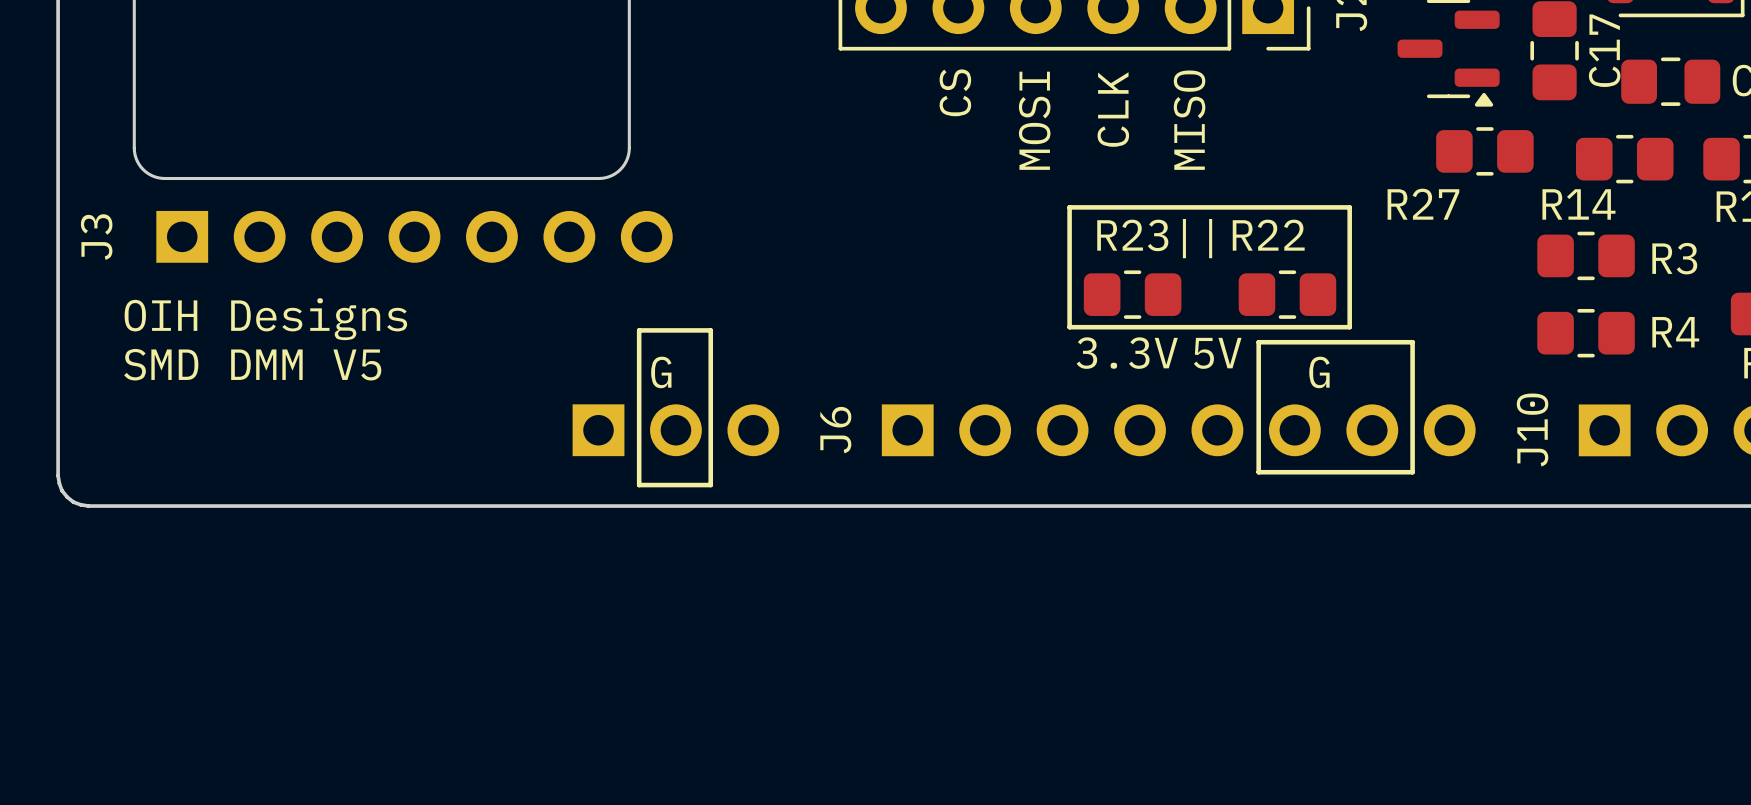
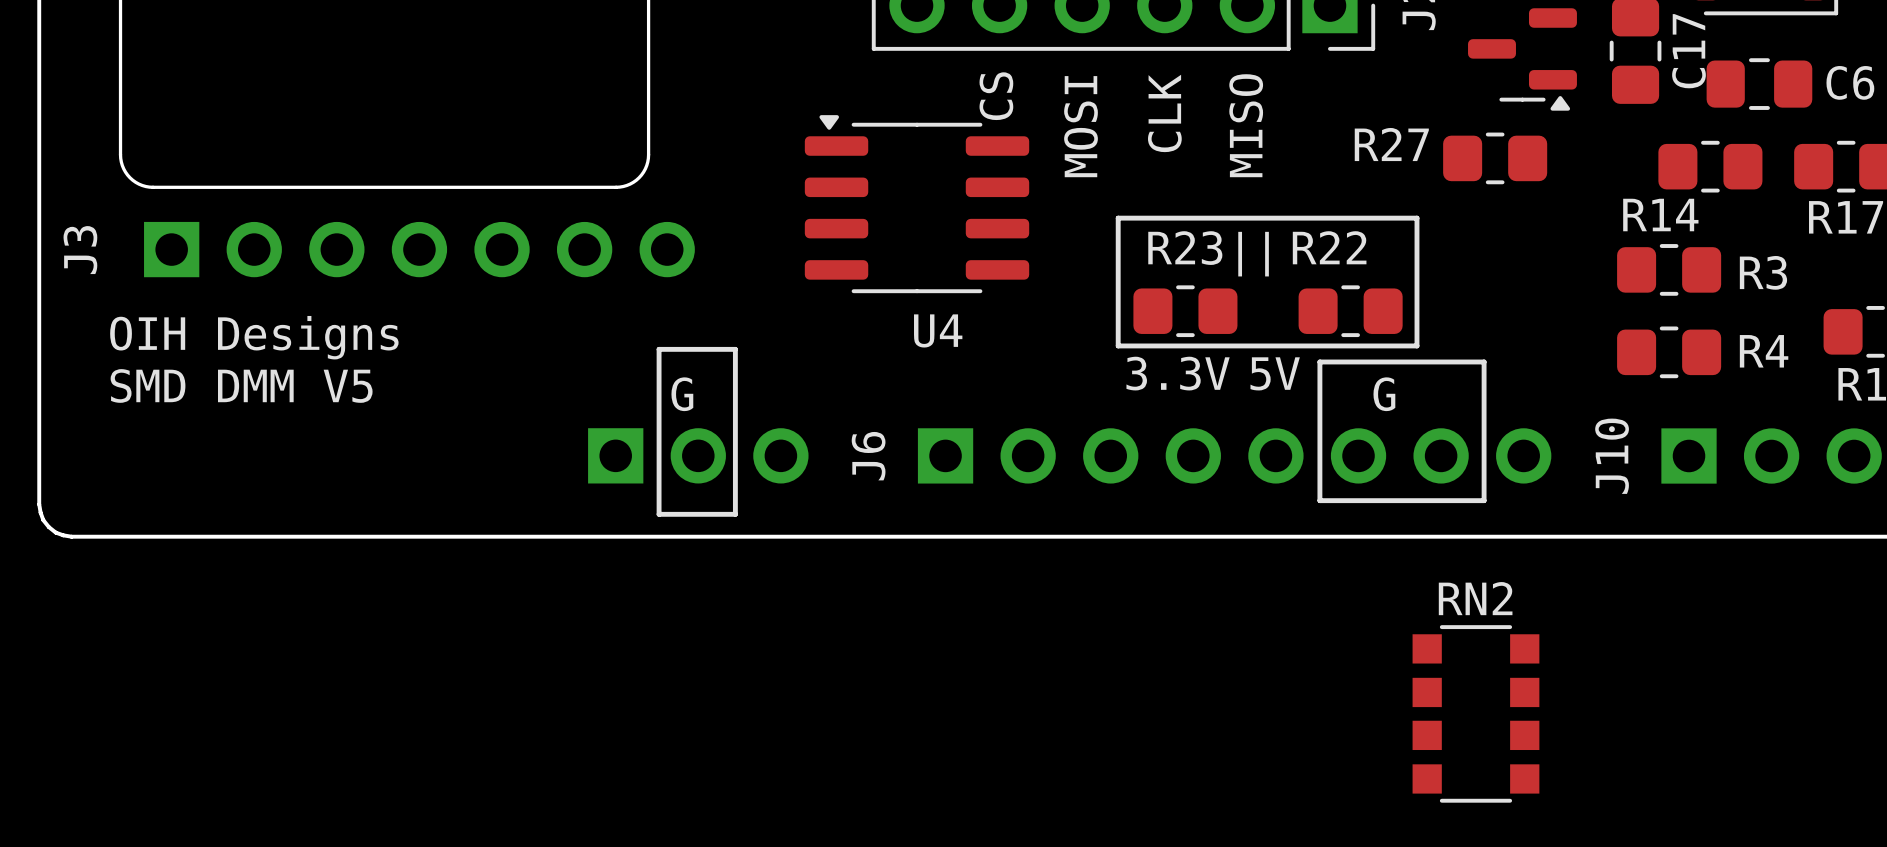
R27 position: (1484, 151) -> (1495, 158)
U4: none -> (917, 204)
R27 name position: R27 (1423, 204) -> R27 (1391, 144)
RN2: none -> (1475, 713)

